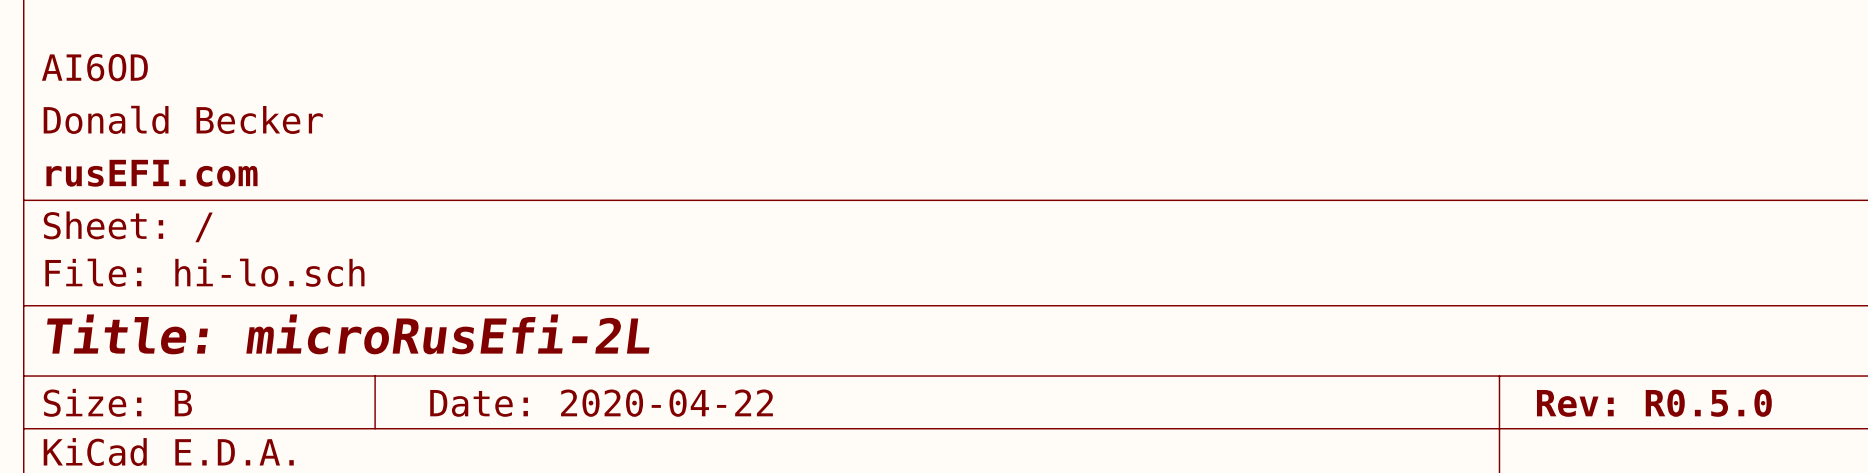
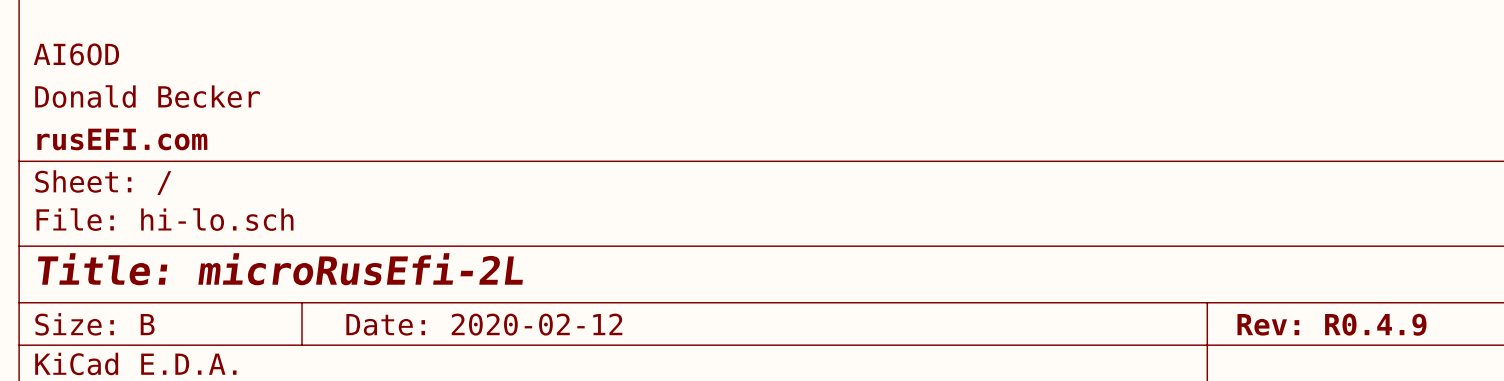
title block: Date: 2020-04-22 (601, 403) -> Date: 2020-02-12 (484, 324)
title block: Rev: R0.5.0 (1654, 403) -> Rev: R0.4.9 (1331, 324)

